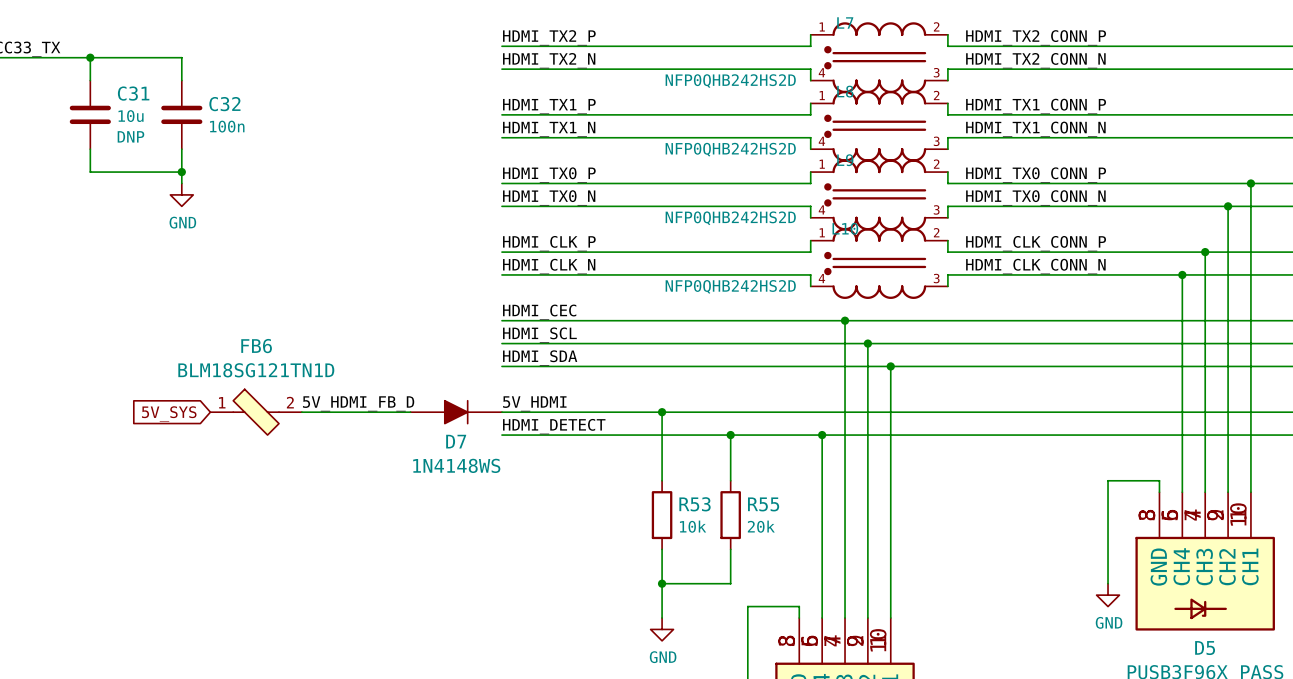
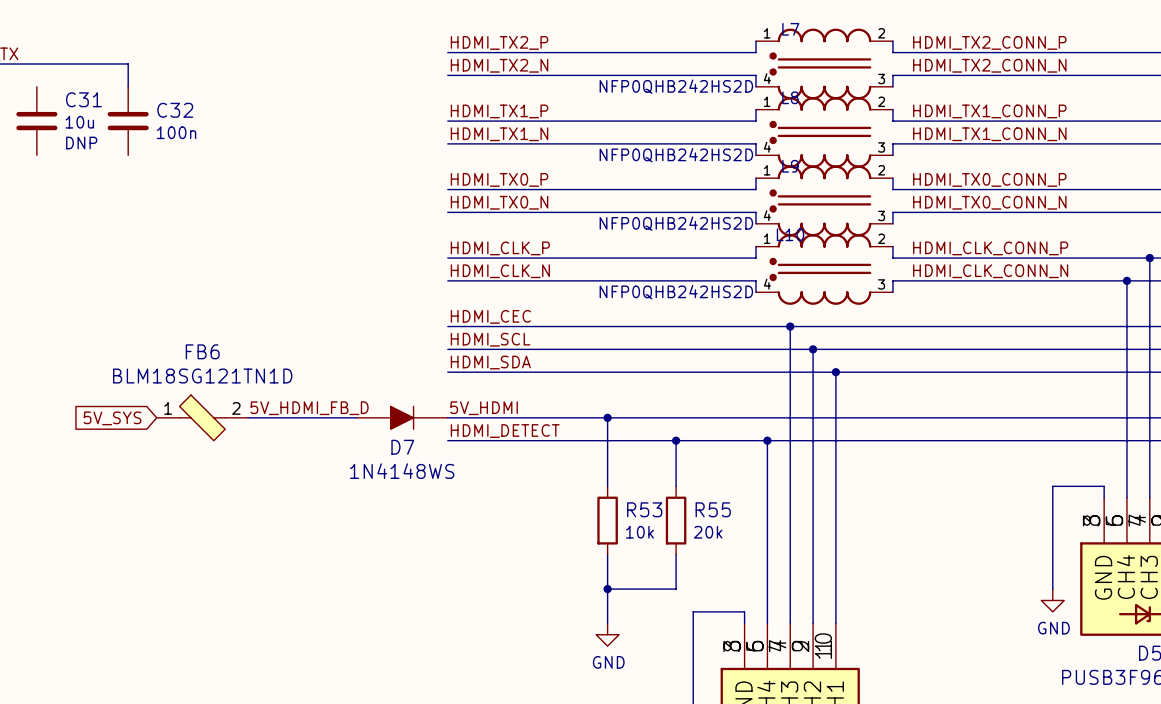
wire: (90, 57) (90, 80) -> none
junction: (90, 57) -> none
wire: (90, 149) (90, 172) (181, 172) -> none
wire: (181, 149) (181, 183) -> none
junction: (181, 172) -> none
power symbol: GND (181, 194) -> none

